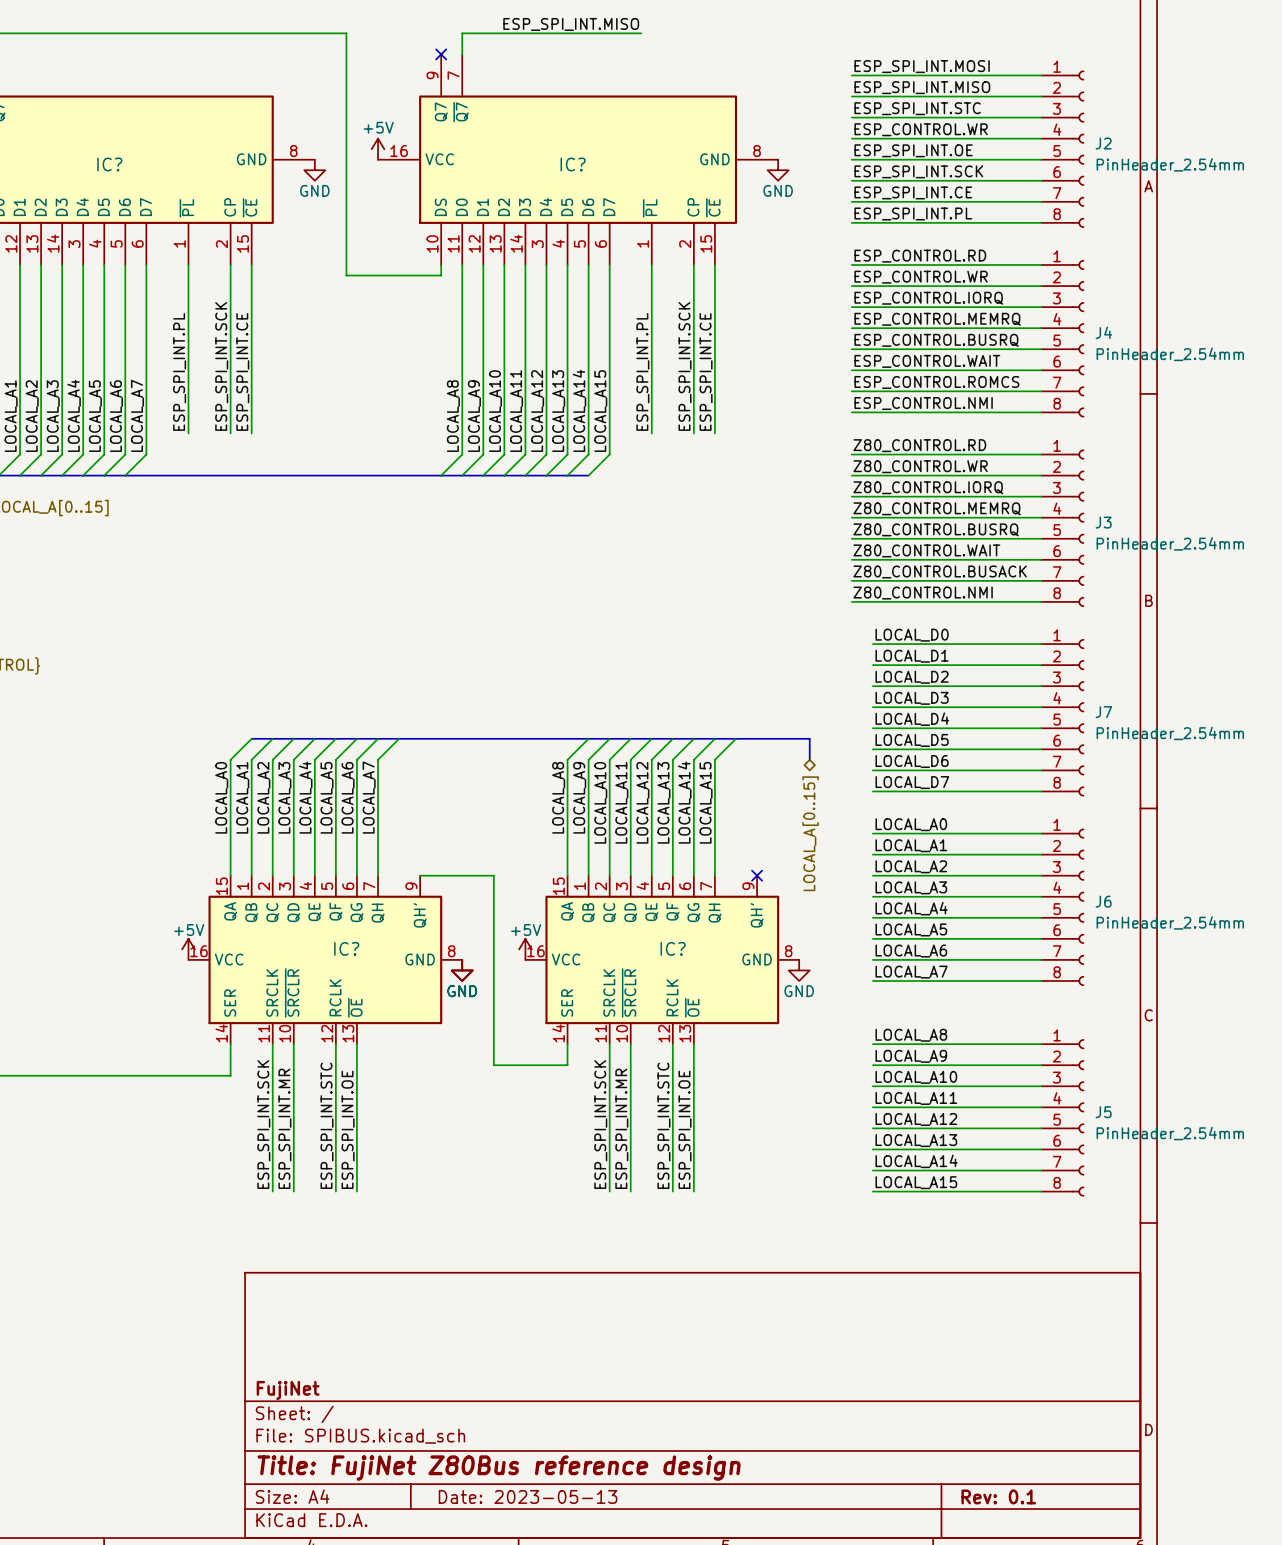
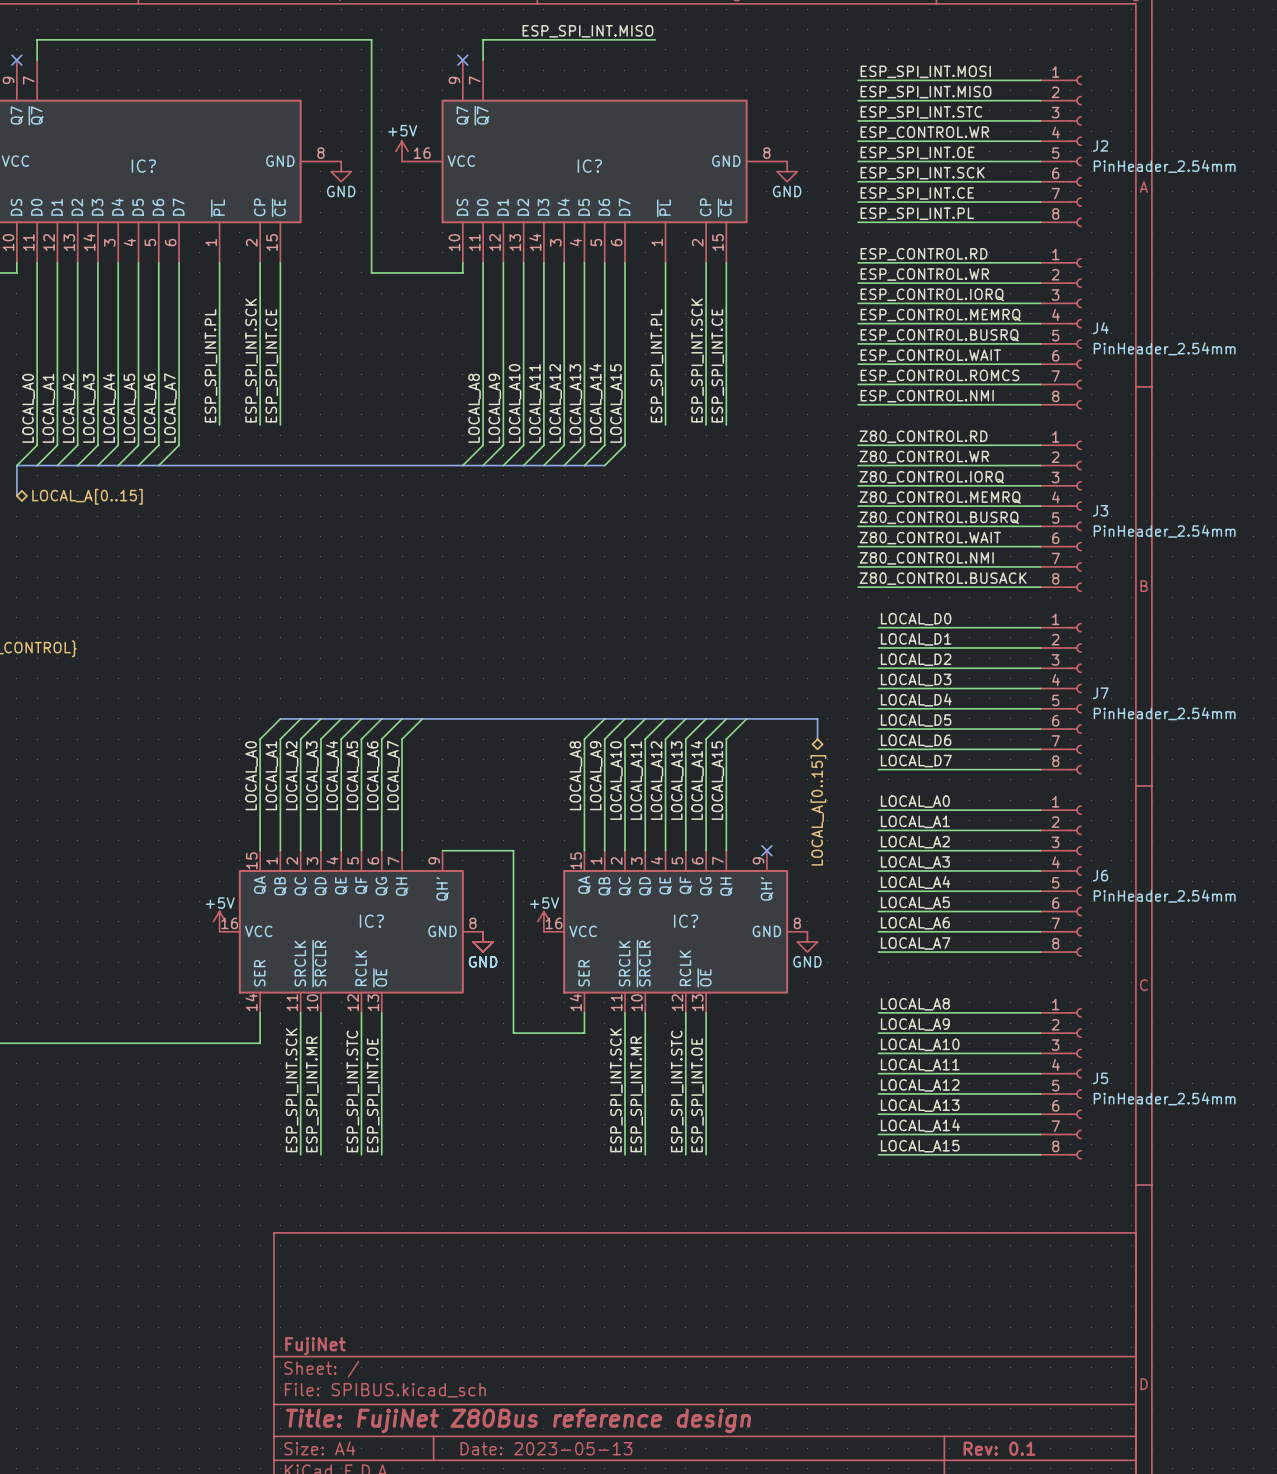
label: Z80_CONTROL.BUSACK (940, 571) -> Z80_CONTROL.NMI (926, 558)
label: Z80_CONTROL.NMI (923, 593) -> Z80_CONTROL.BUSACK (943, 578)

